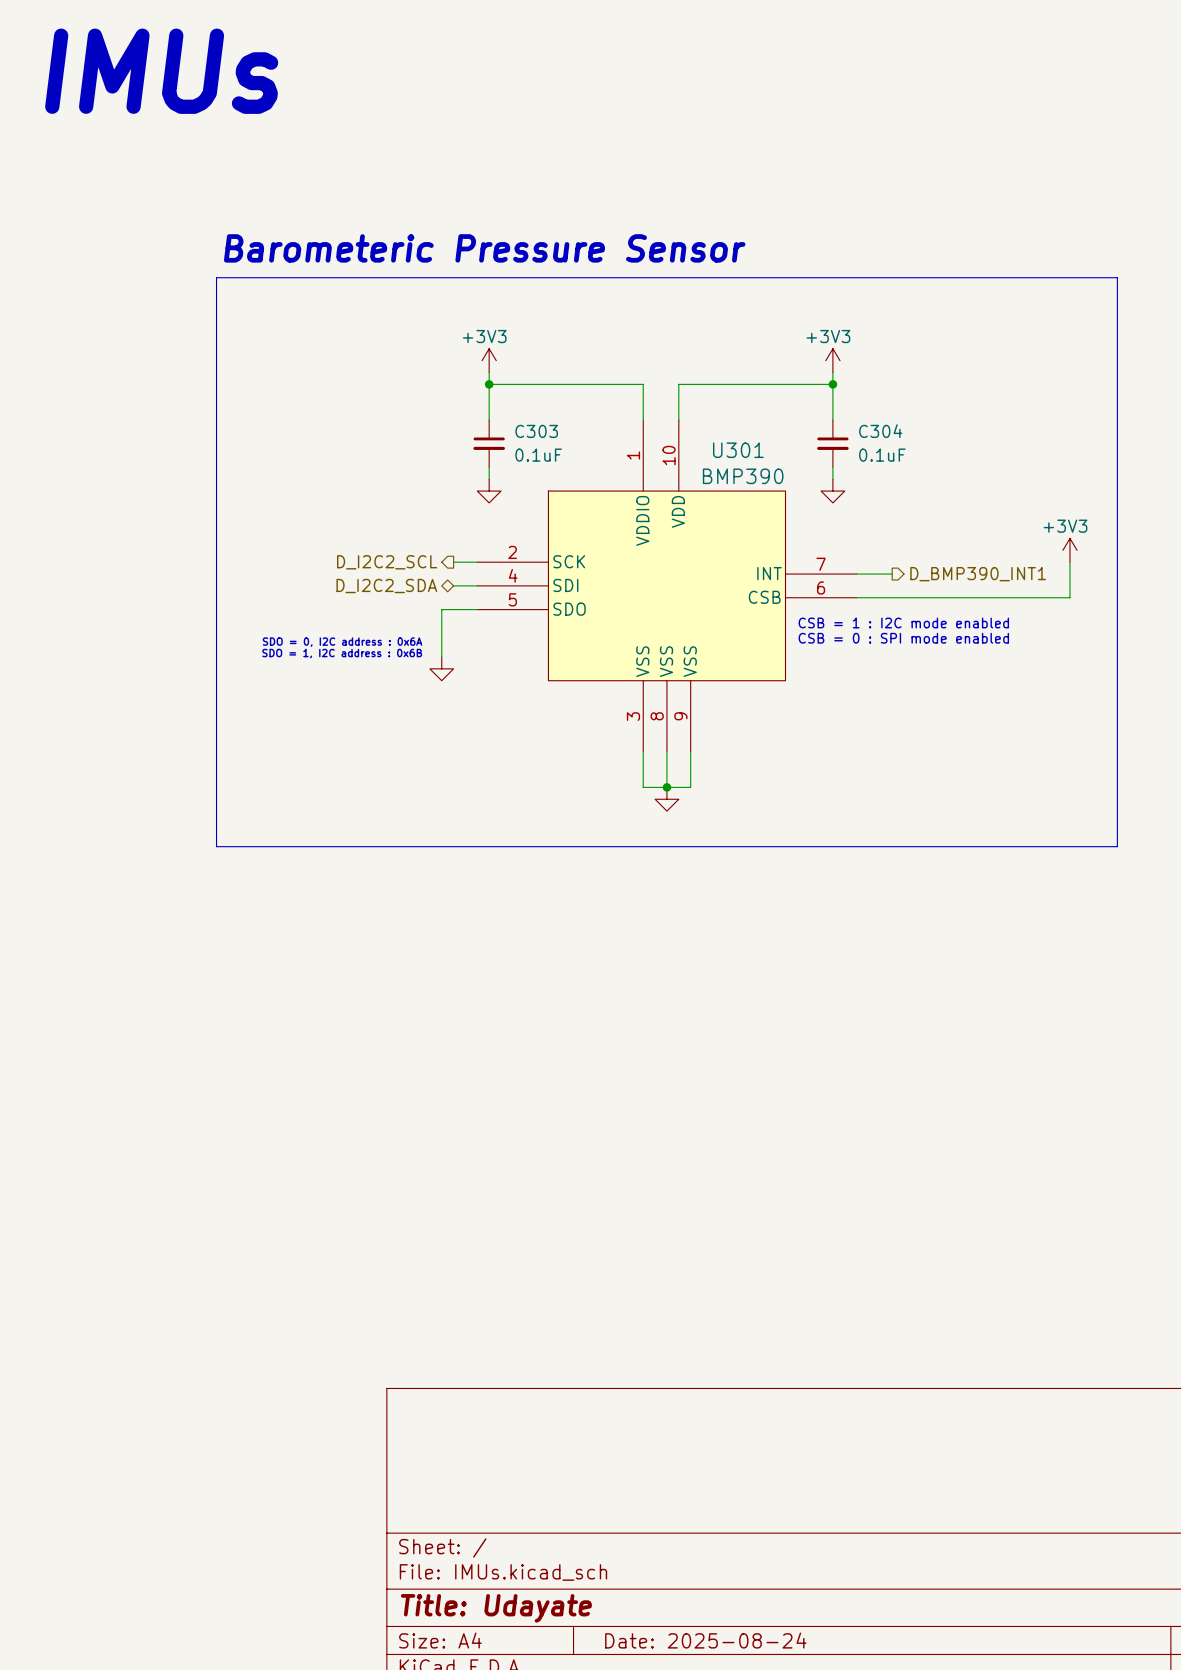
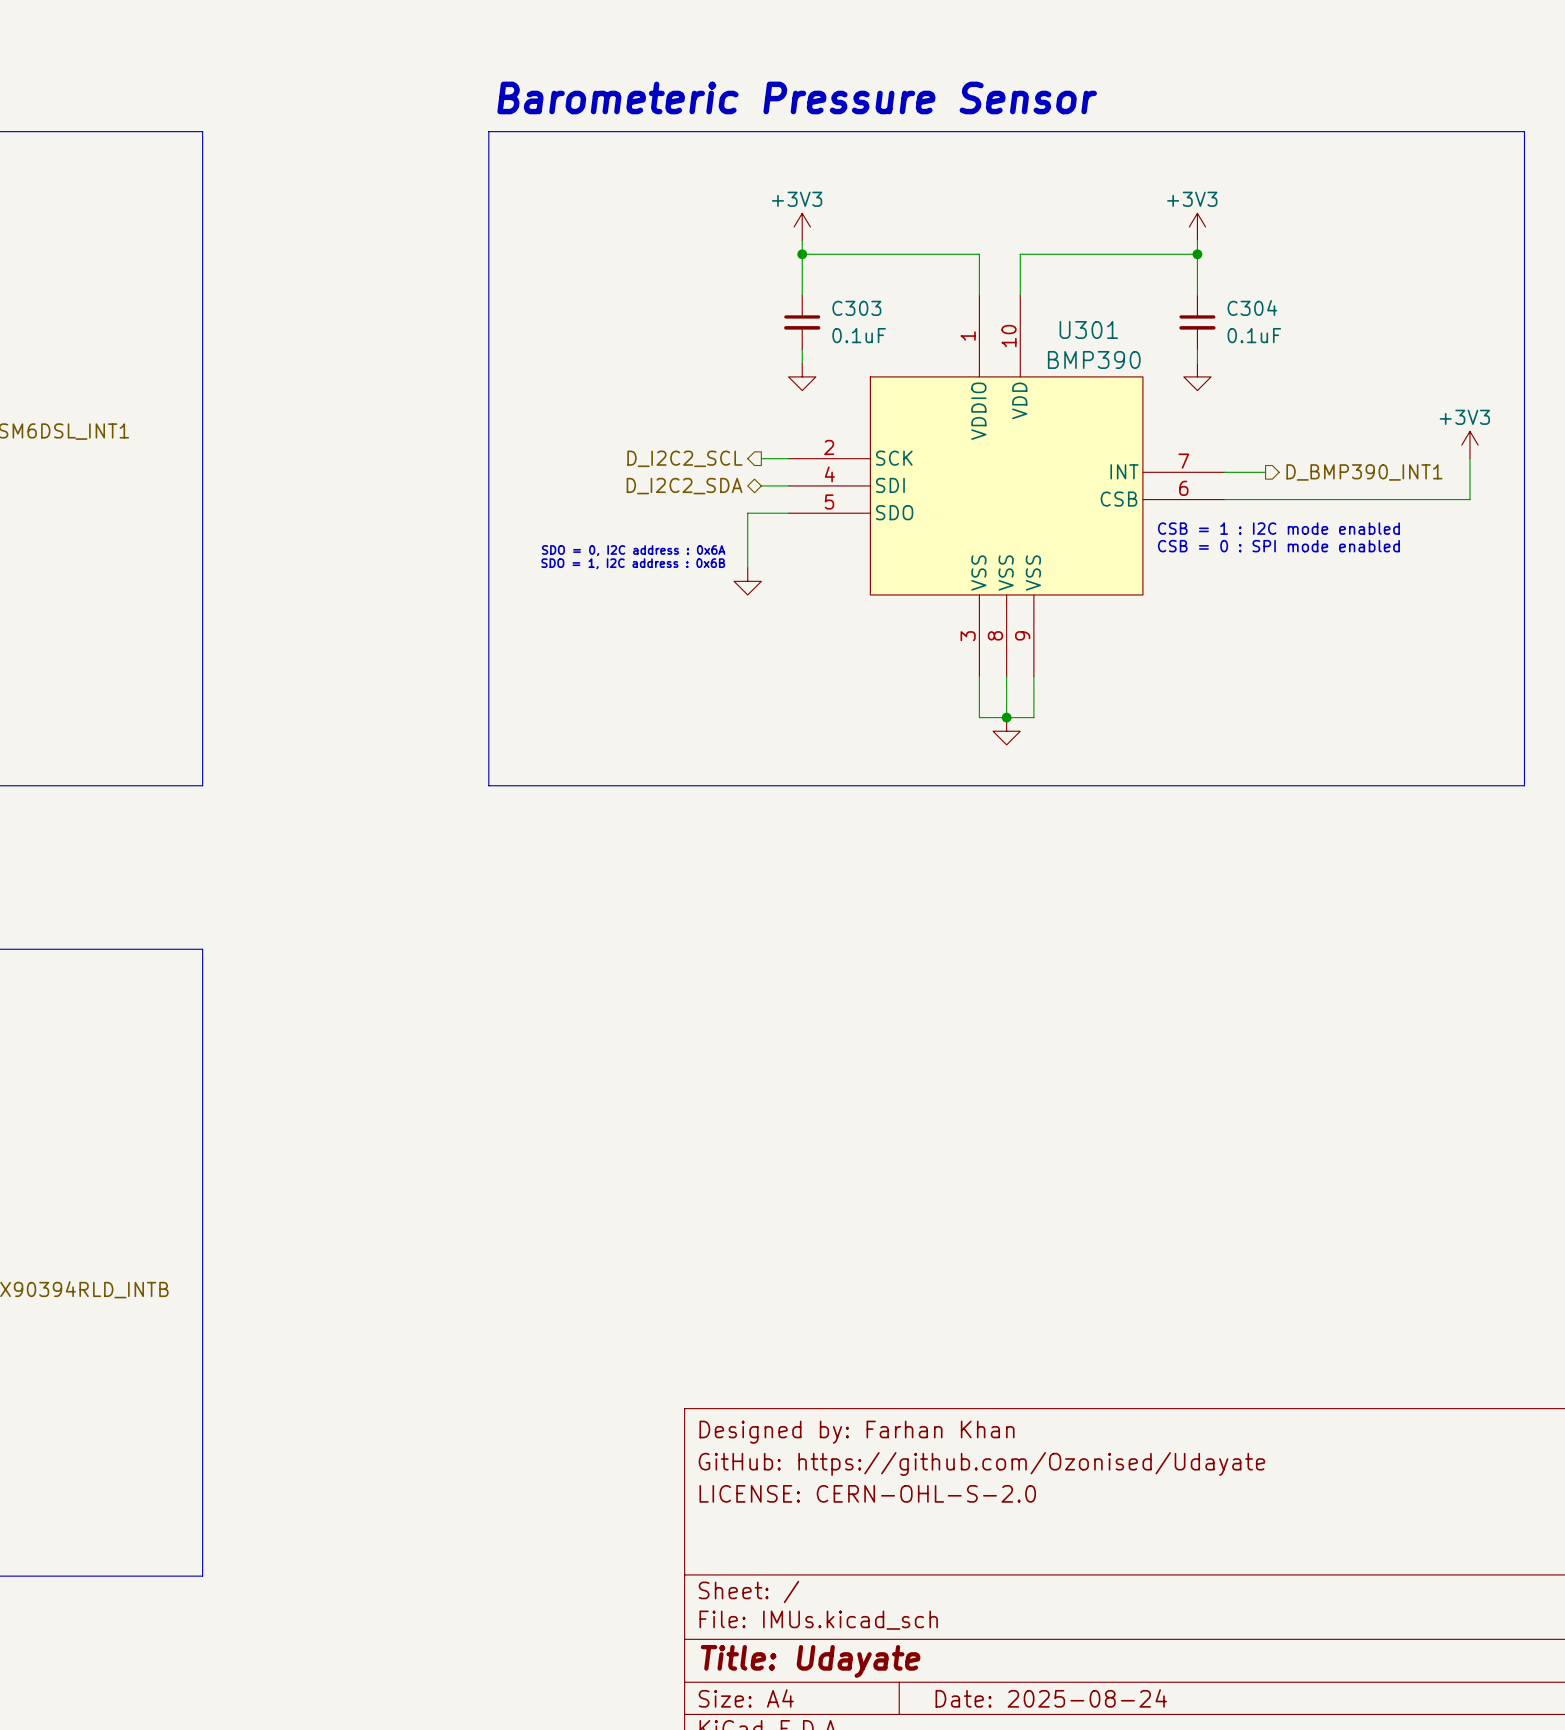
title block: none -> Designed by: Farhan Khan (857, 1432)
title block: none -> GitHub: https://github.com/Ozonised/Udayate (981, 1463)
title block: none -> LICENSE: CERN-OHL-S-2.0 (867, 1493)

